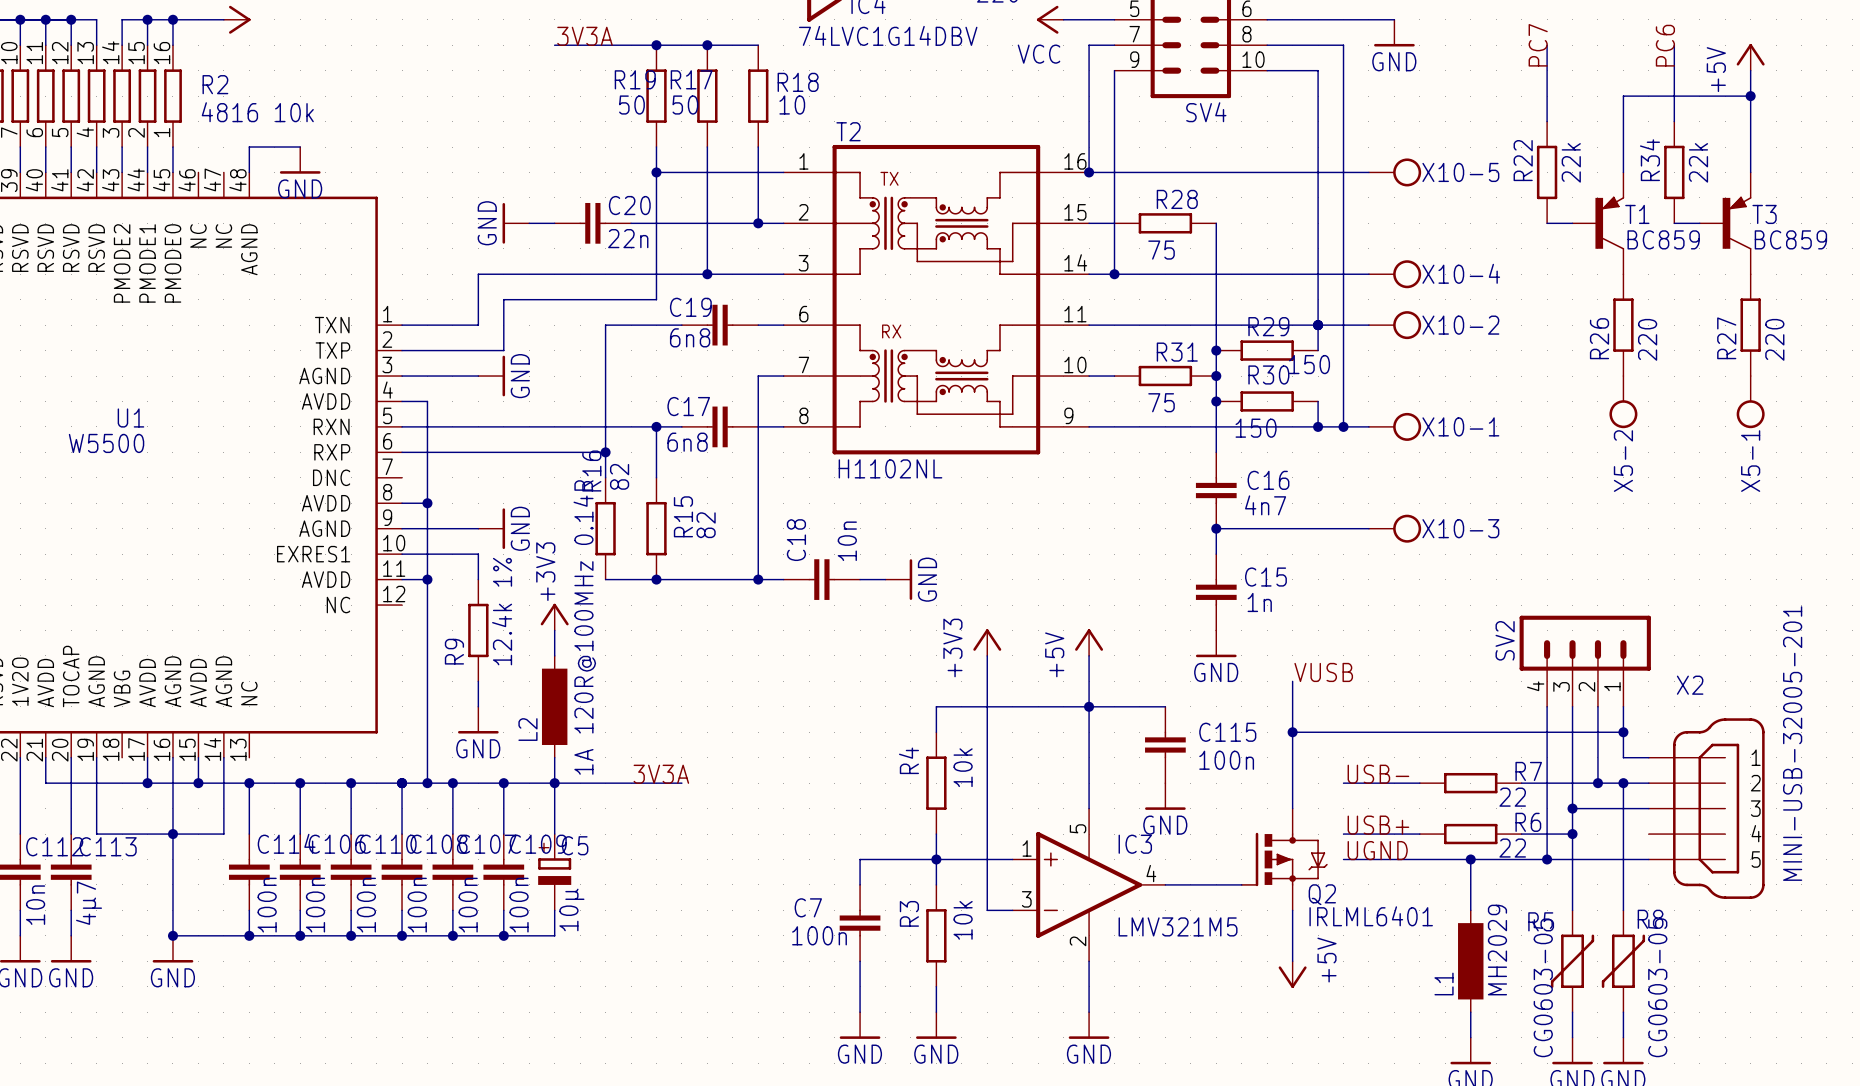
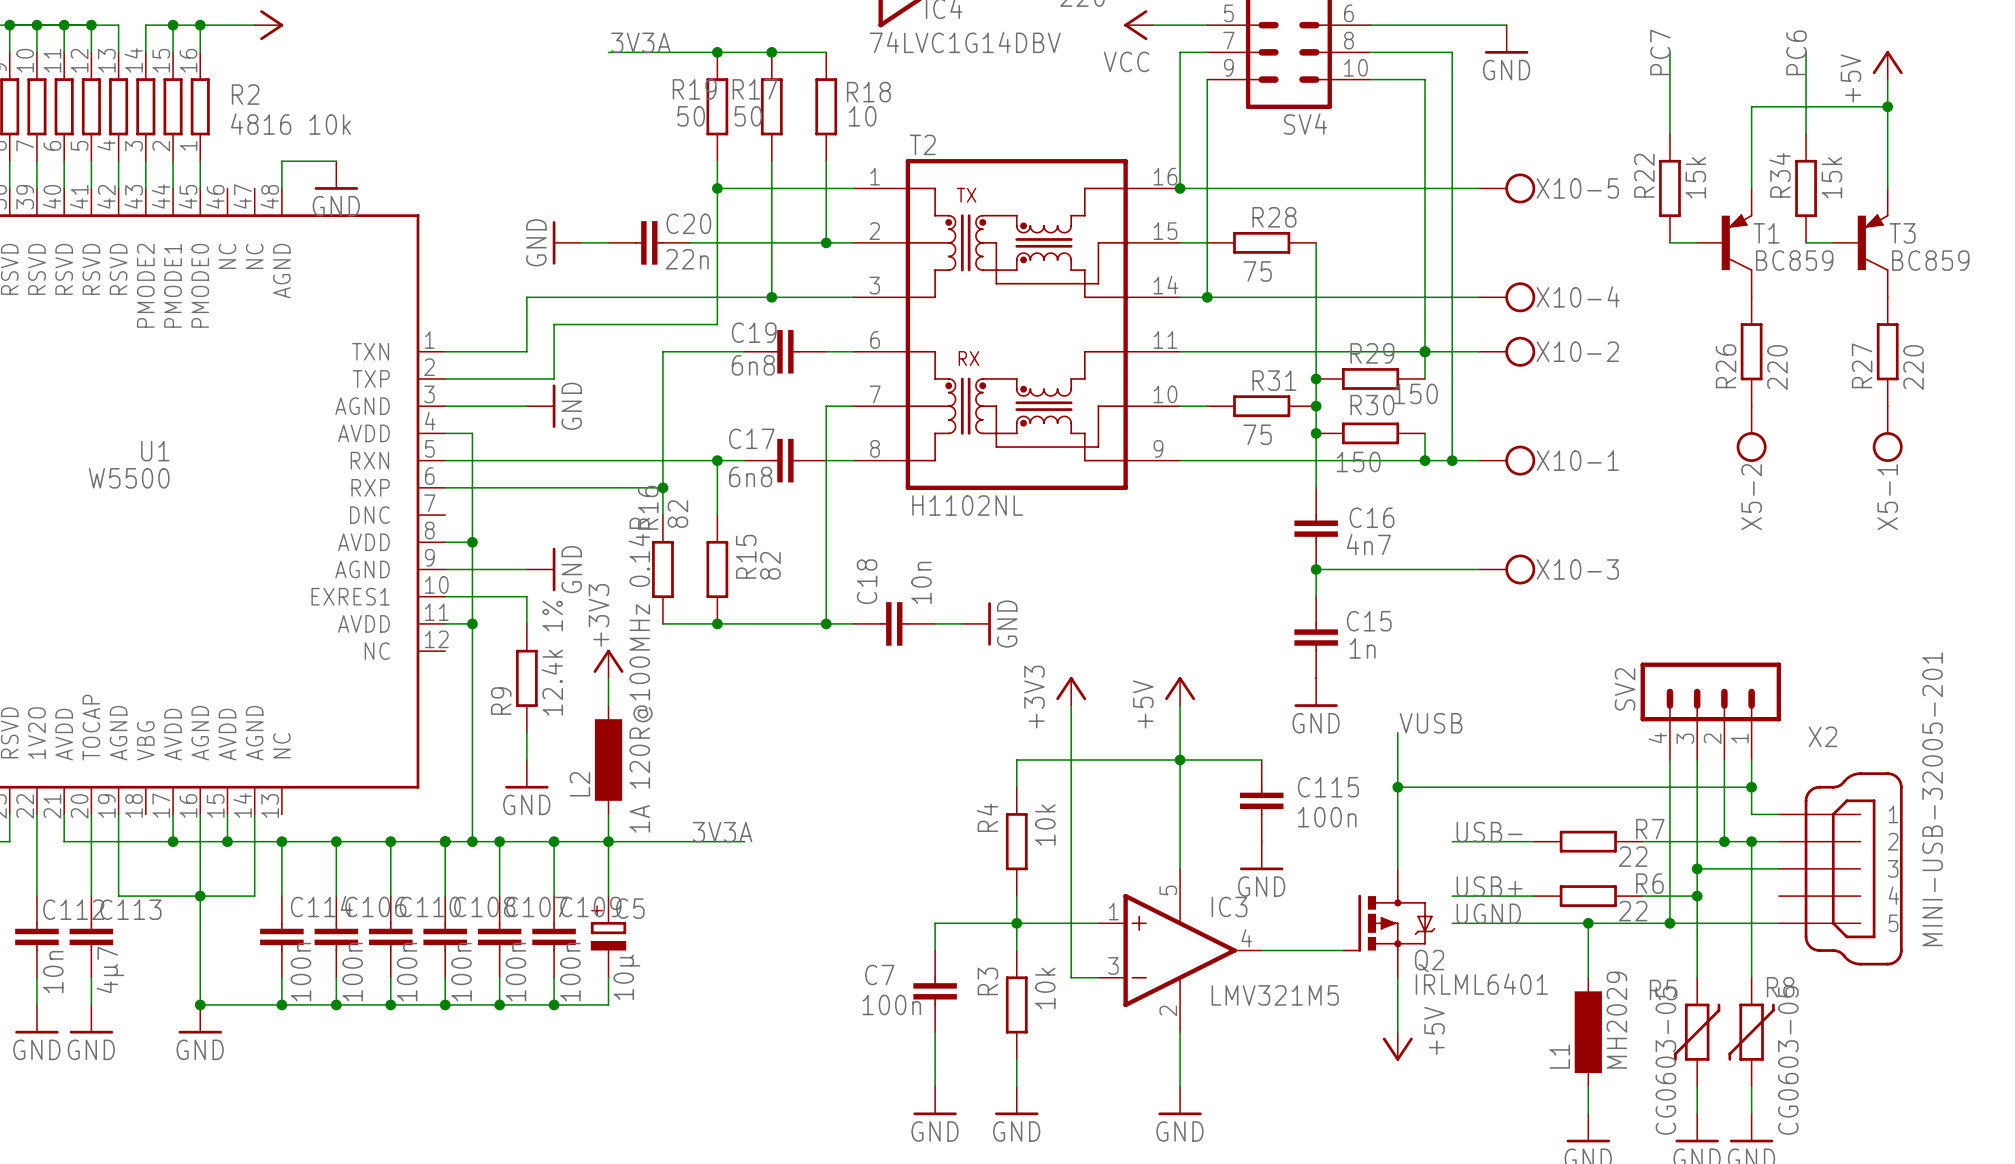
R22 value: 22k (1571, 162) -> 15k (1695, 177)
R34 value: 22k (1698, 162) -> 15k (1831, 177)

